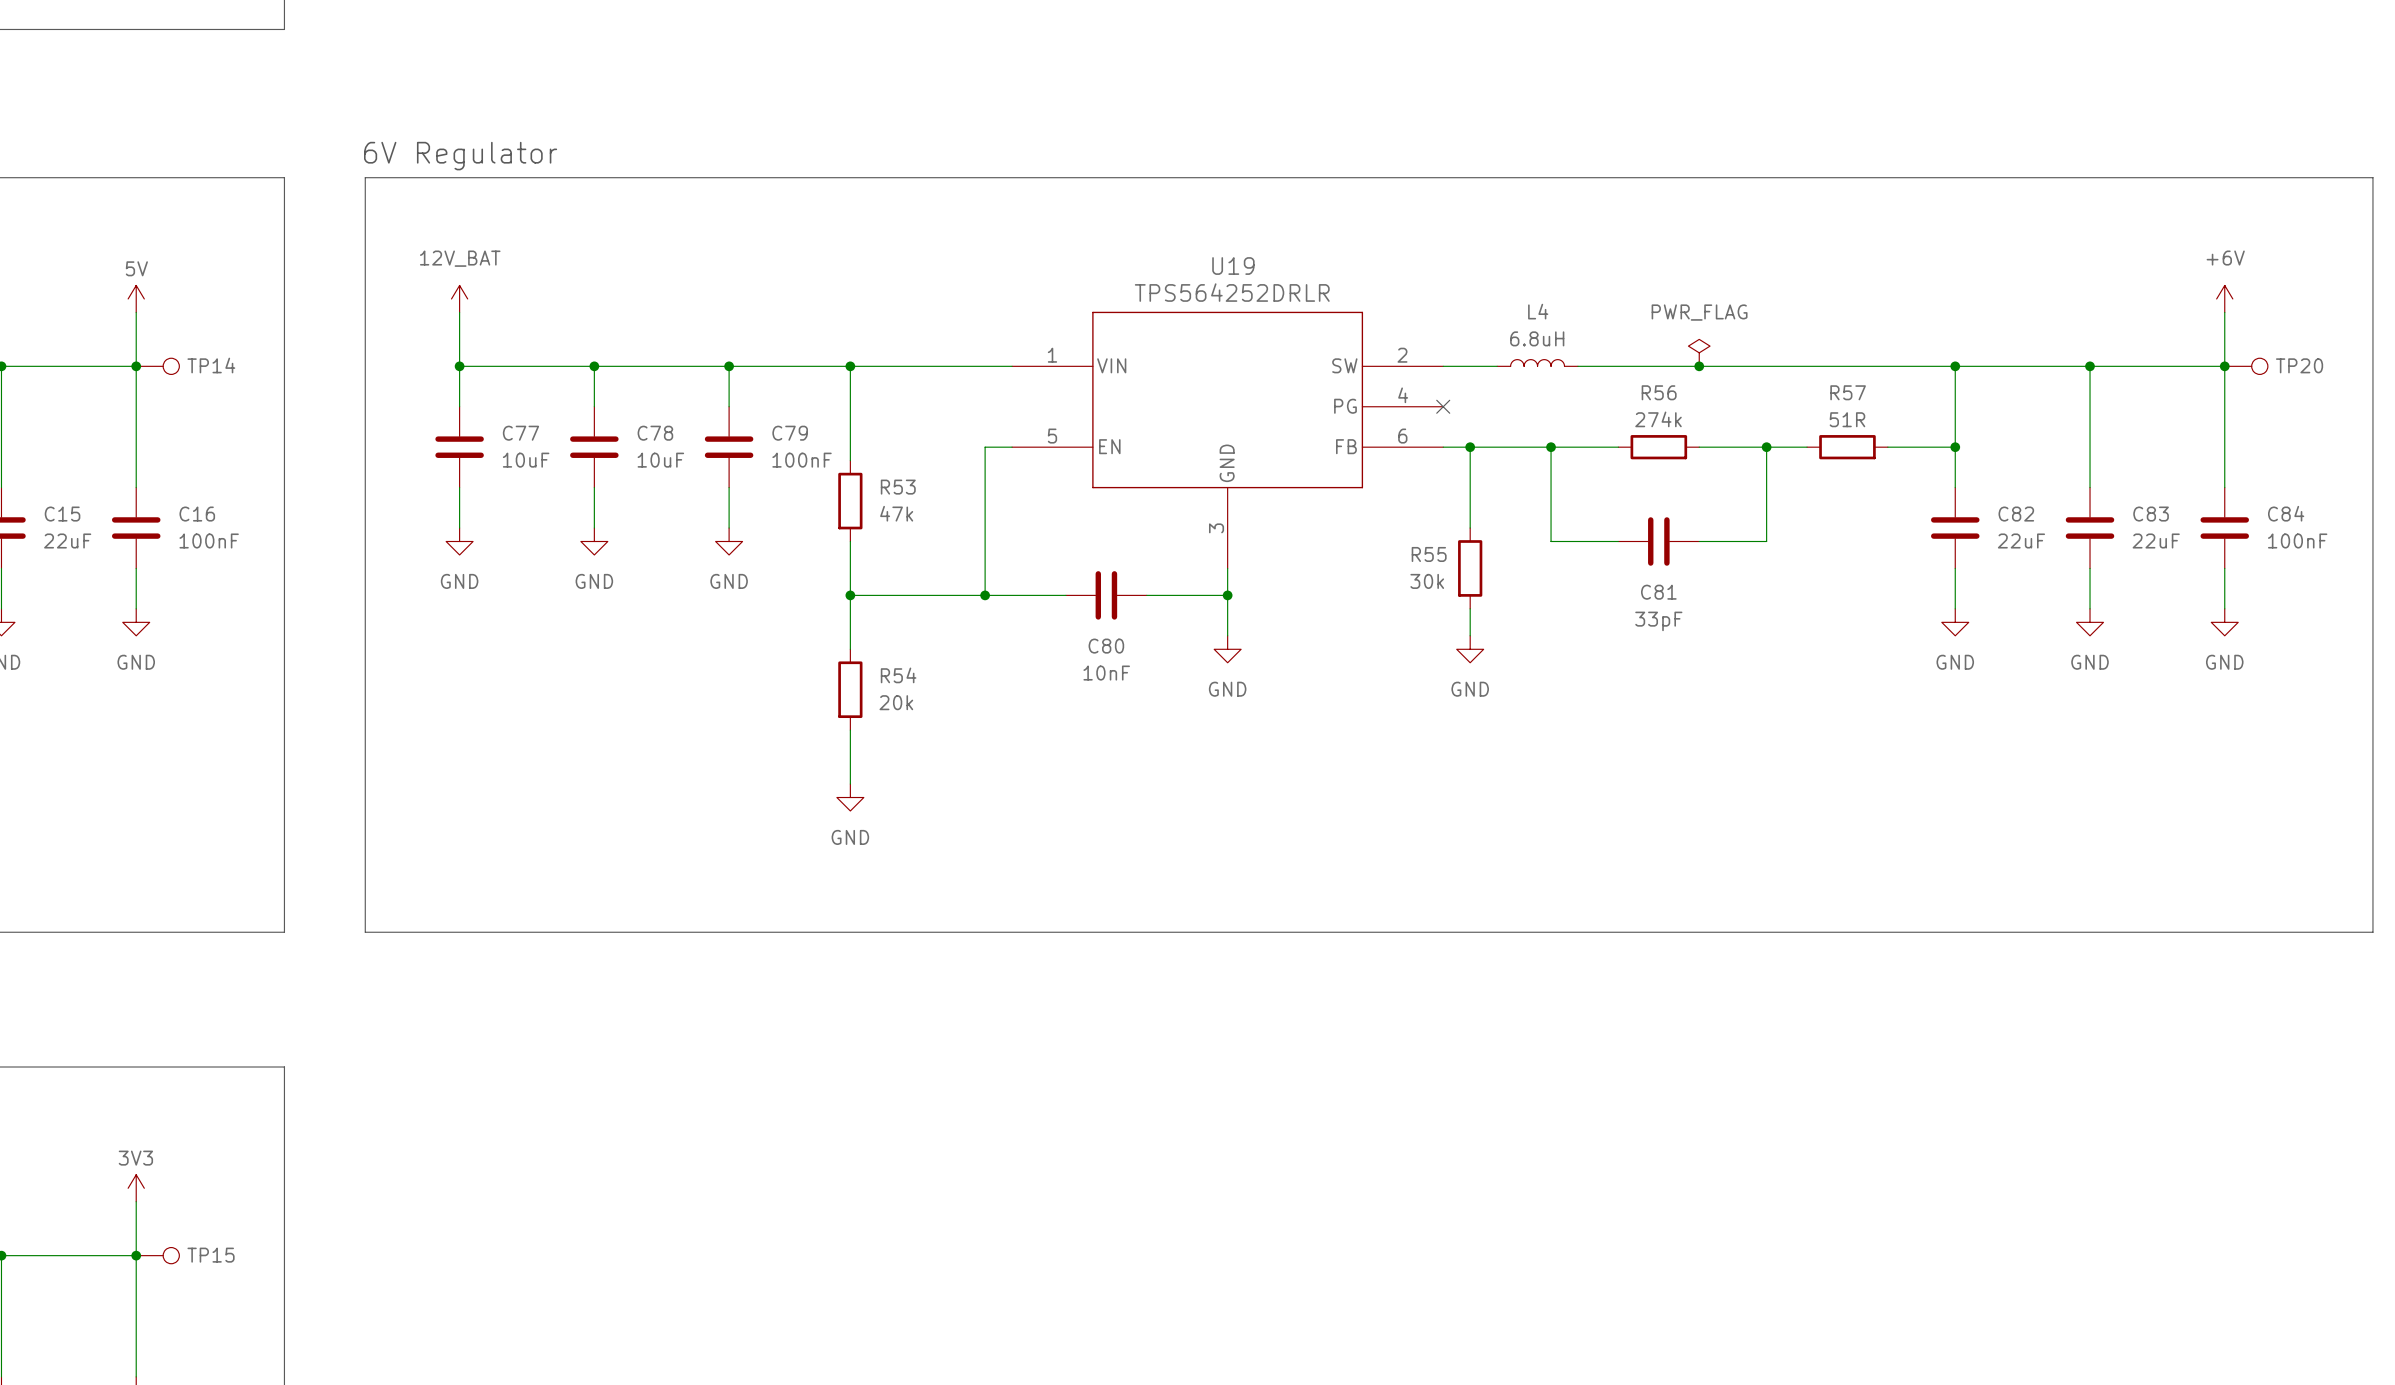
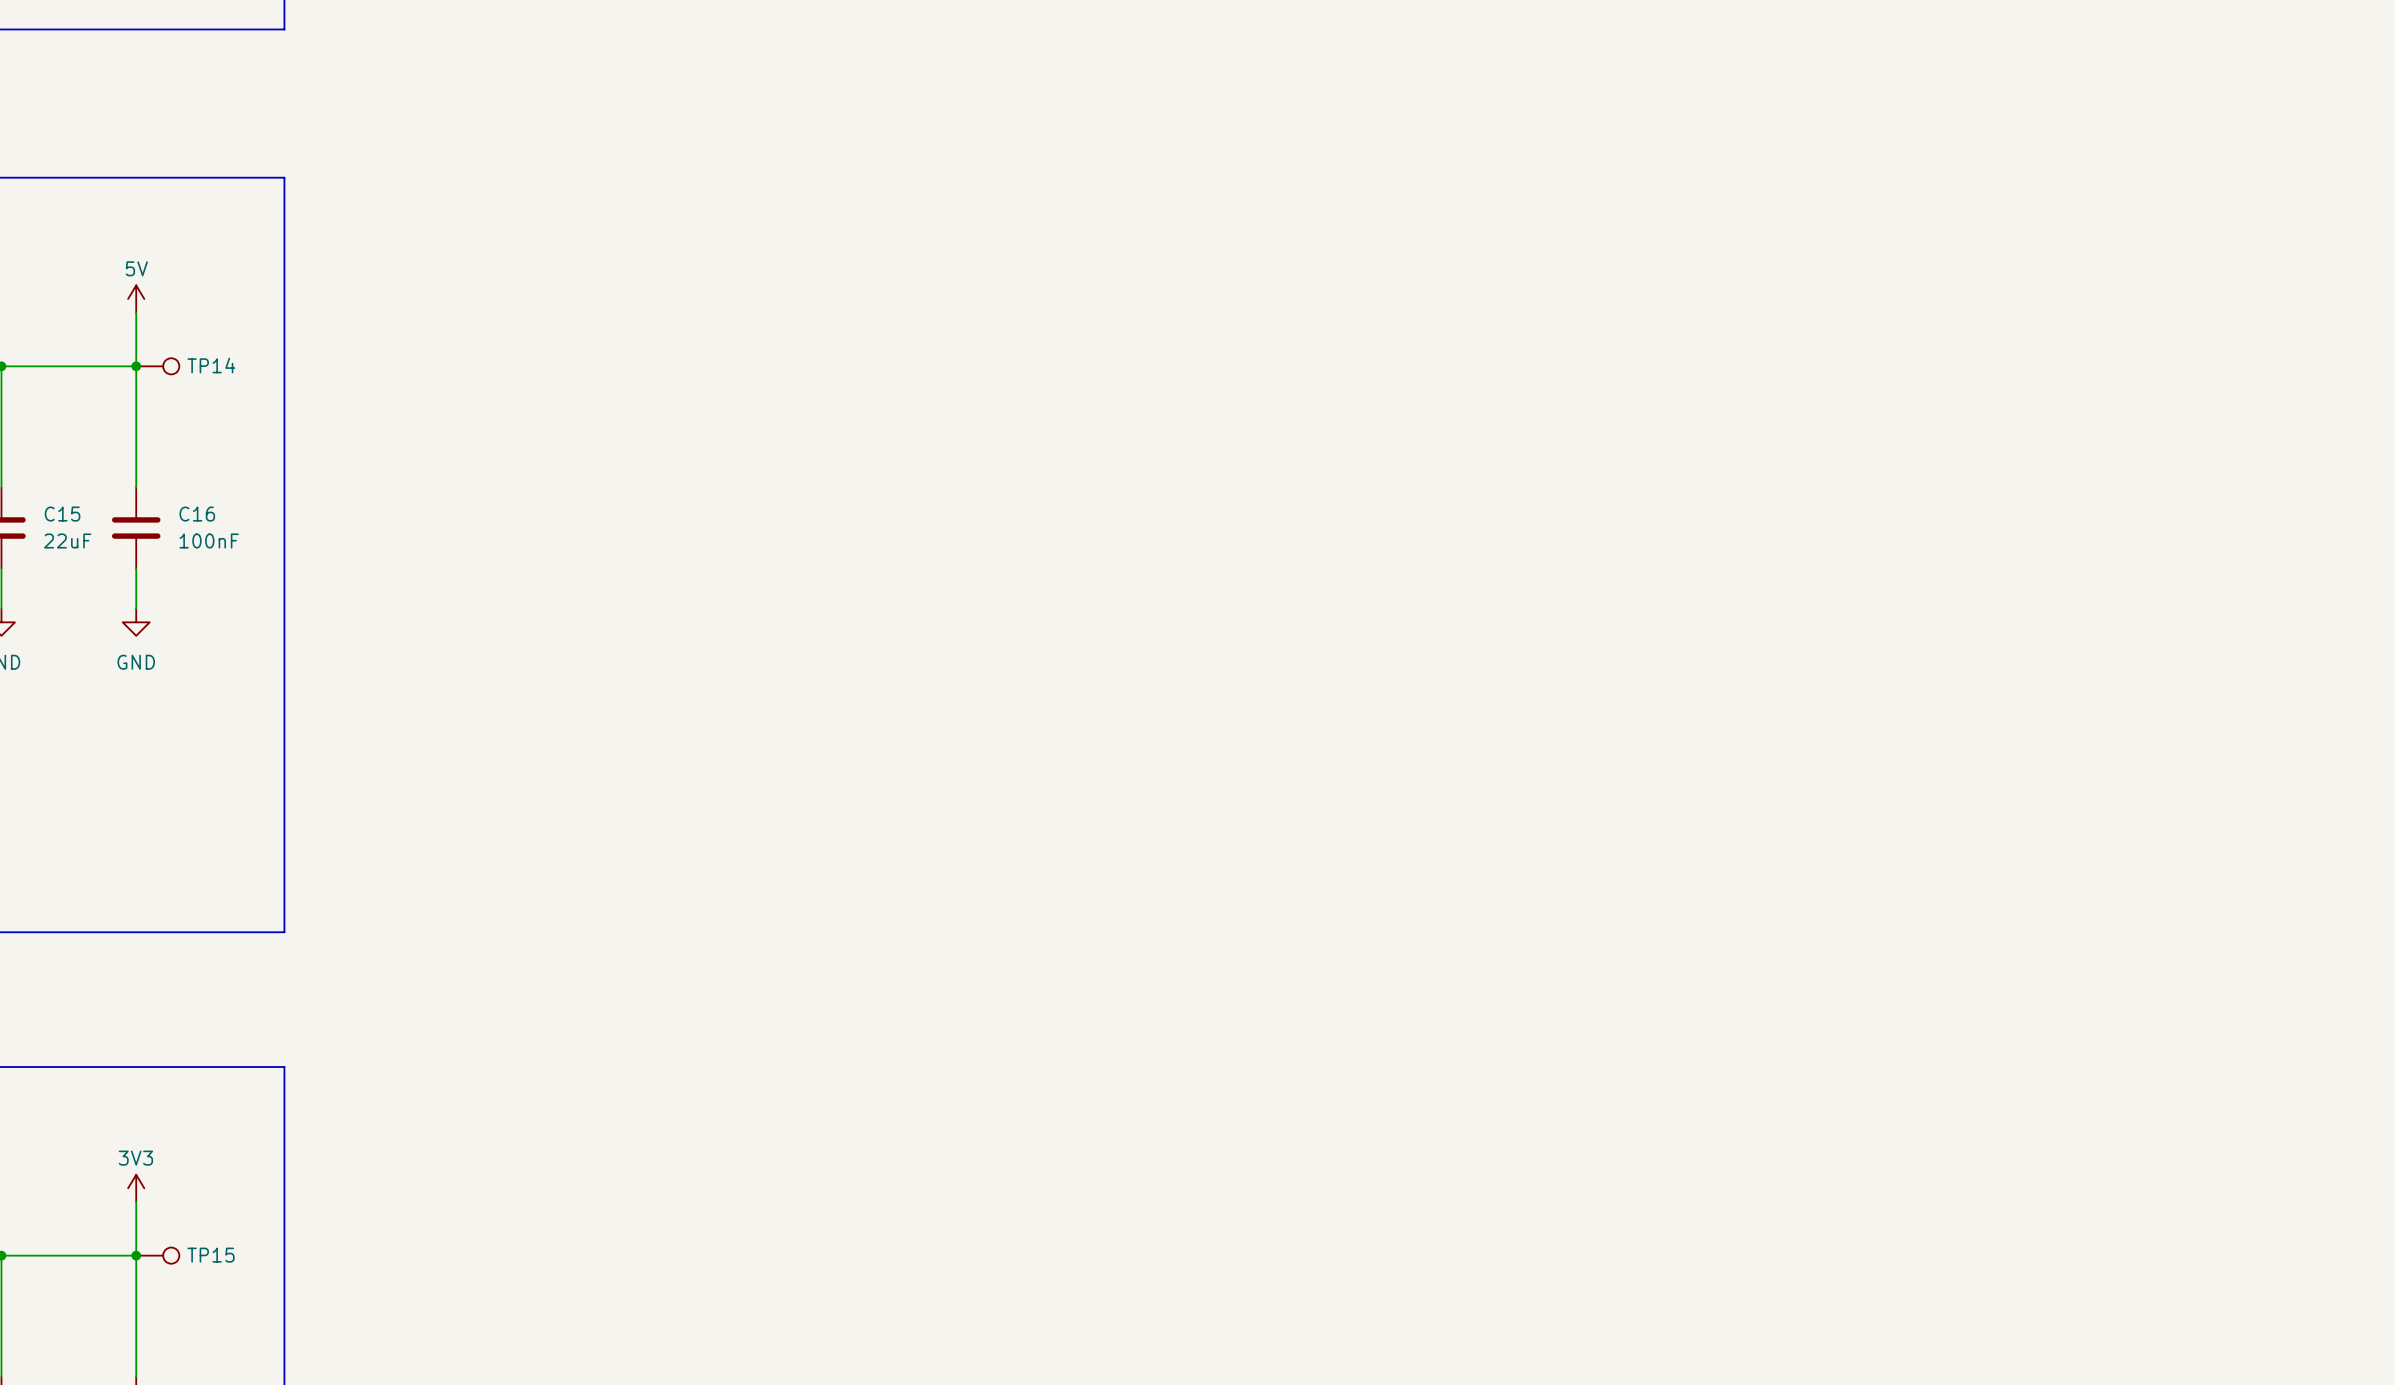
text: 6V Regulator (460, 156) -> none
line: (365, 177) (2372, 177) (2372, 932) (365, 932) (365, 177) -> none
power symbol: 12V_BAT (459, 298) -> none
power symbol: +6V (2224, 298) -> none
wire: (459, 312) (459, 406) -> none
wire: (2224, 312) (2224, 487) -> none
power symbol: PWR_FLAG (1699, 352) -> none
L4: 6.8uH (1537, 362) -> none
wire: (459, 366) (1012, 366) -> none
junction: (459, 366) -> none
wire: (594, 366) (594, 406) -> none
junction: (594, 366) -> none
wire: (729, 366) (729, 406) -> none
junction: (729, 366) -> none
wire: (850, 366) (850, 460) -> none
junction: (850, 366) -> none
wire: (1443, 366) (1497, 366) -> none
wire: (1577, 366) (2224, 366) -> none
junction: (1699, 366) -> none
wire: (1955, 366) (1955, 487) -> none
junction: (1955, 366) -> none
wire: (2090, 366) (2090, 487) -> none
junction: (2090, 366) -> none
junction: (2224, 366) -> none
TP20: (2246, 366) -> none
no-connect mark: (1443, 406) -> none
U19: TPS564252DRLR (1227, 440) -> none
C77: 10uF (459, 447) -> none
C78: 10uF (594, 447) -> none
C79: 100nF (729, 447) -> none
wire: (1012, 447) (985, 447) (985, 595) -> none
wire: (1443, 447) (1618, 447) -> none
wire: (1470, 447) (1470, 528) -> none
junction: (1470, 447) -> none
wire: (1551, 447) (1551, 541) (1618, 541) -> none
junction: (1551, 447) -> none
R56: 274k (1658, 447) -> none
wire: (1699, 447) (1807, 447) -> none
wire: (1766, 447) (1766, 541) (1699, 541) -> none
junction: (1766, 447) -> none
R57: 51R (1847, 447) -> none
wire: (1887, 447) (1955, 447) -> none
junction: (1955, 447) -> none
wire: (459, 487) (459, 528) -> none
wire: (594, 487) (594, 528) -> none
wire: (729, 487) (729, 528) -> none
R53: 47k (850, 501) -> none
C82: 22uF (1955, 528) -> none
C83: 22uF (2090, 528) -> none
C84: 100nF (2224, 528) -> none
power symbol: GND (459, 541) -> none
power symbol: GND (594, 541) -> none
power symbol: GND (729, 541) -> none
wire: (850, 541) (850, 649) -> none
C81: 33pF (1658, 541) -> none
wire: (1227, 568) (1227, 635) -> none
R55: 30k (1470, 568) -> none
wire: (1955, 568) (1955, 608) -> none
wire: (2090, 568) (2090, 608) -> none
wire: (2224, 568) (2224, 608) -> none
wire: (850, 595) (1065, 595) -> none
junction: (850, 595) -> none
junction: (985, 595) -> none
C80: 10nF (1106, 595) -> none
wire: (1146, 595) (1227, 595) -> none
junction: (1227, 595) -> none
wire: (1470, 608) (1470, 635) -> none
power symbol: GND (1955, 622) -> none
power symbol: GND (2090, 622) -> none
power symbol: GND (2224, 622) -> none
power symbol: GND (1227, 649) -> none
power symbol: GND (1470, 649) -> none
R54: 20k (850, 689) -> none
wire: (850, 730) (850, 784) -> none
power symbol: GND (850, 797) -> none

